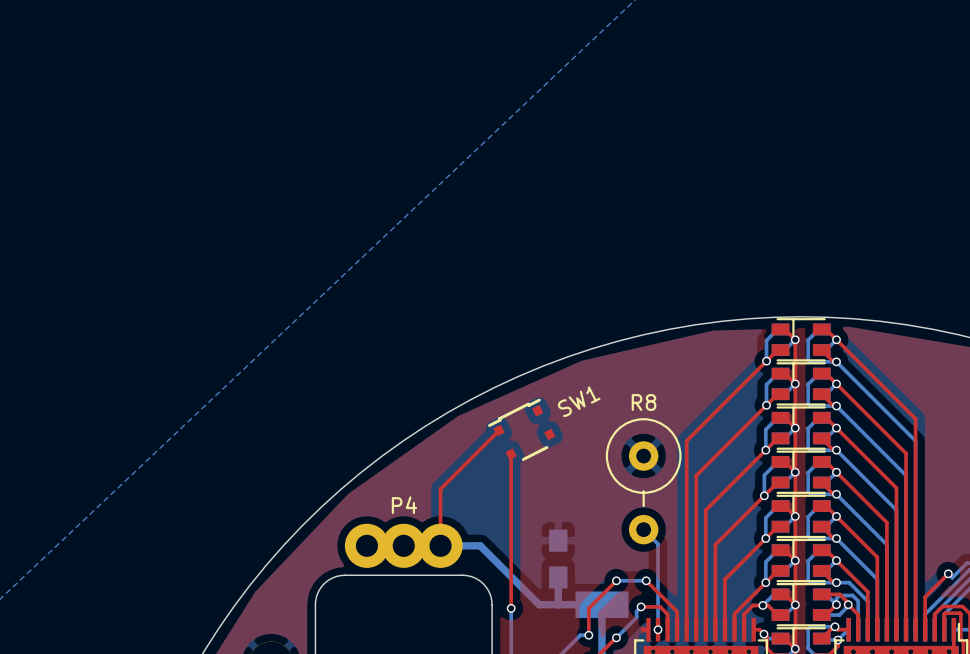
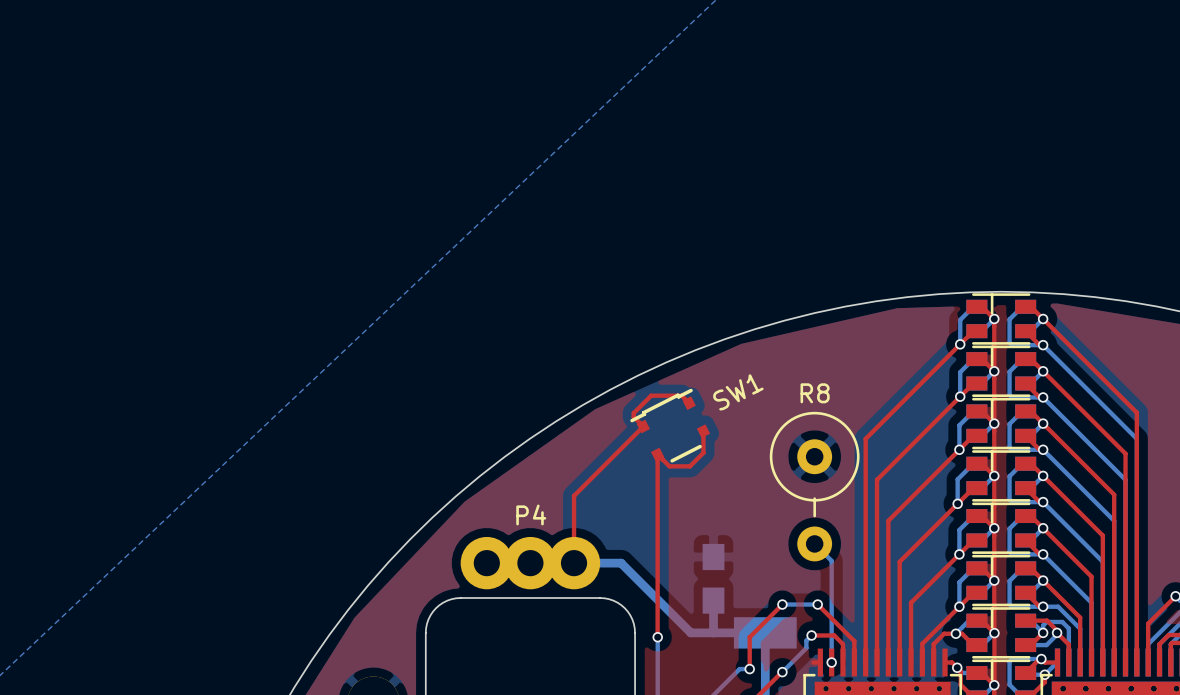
top track: none -> (689, 403) (681, 395) (651, 395) (633, 413) (633, 416) (643, 426)
top track: none -> (703, 431) (703, 452) (689, 466) (669, 466) (657, 454)

